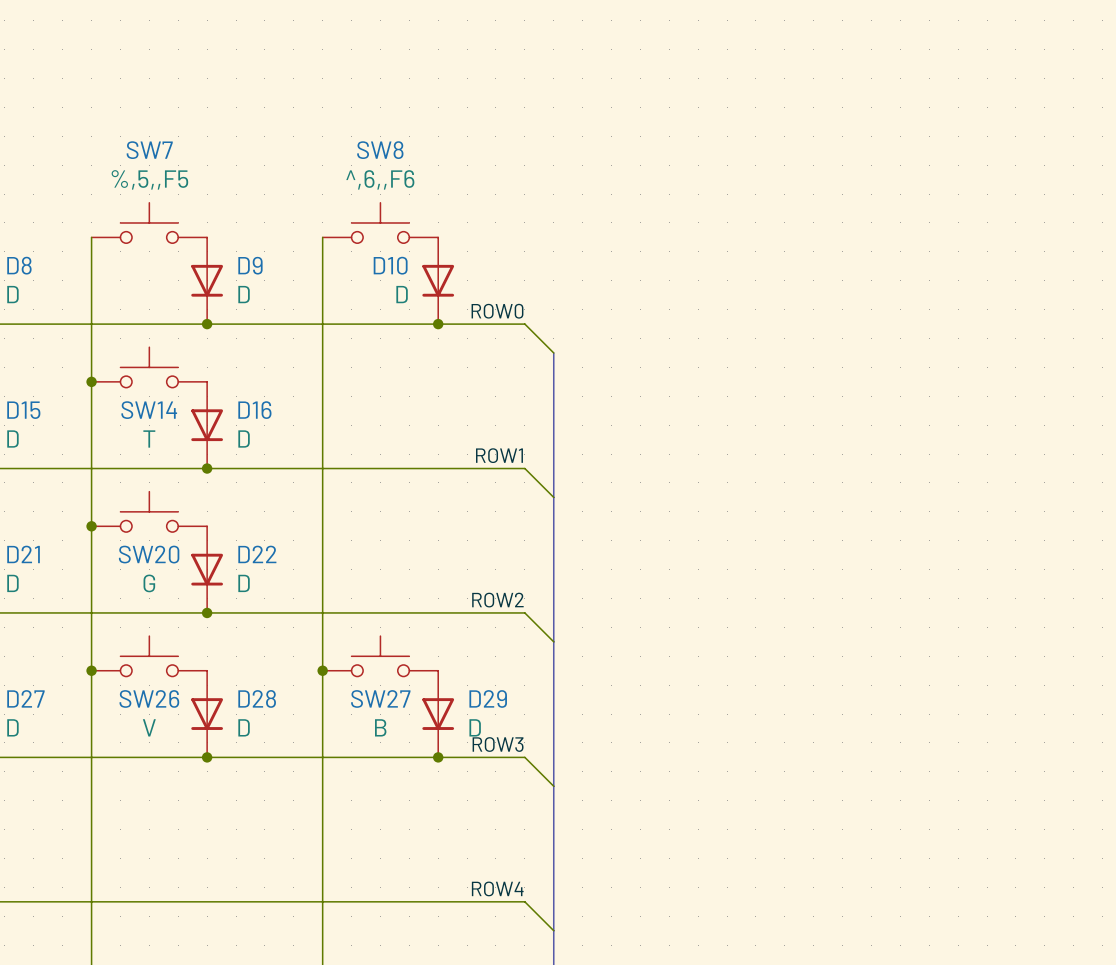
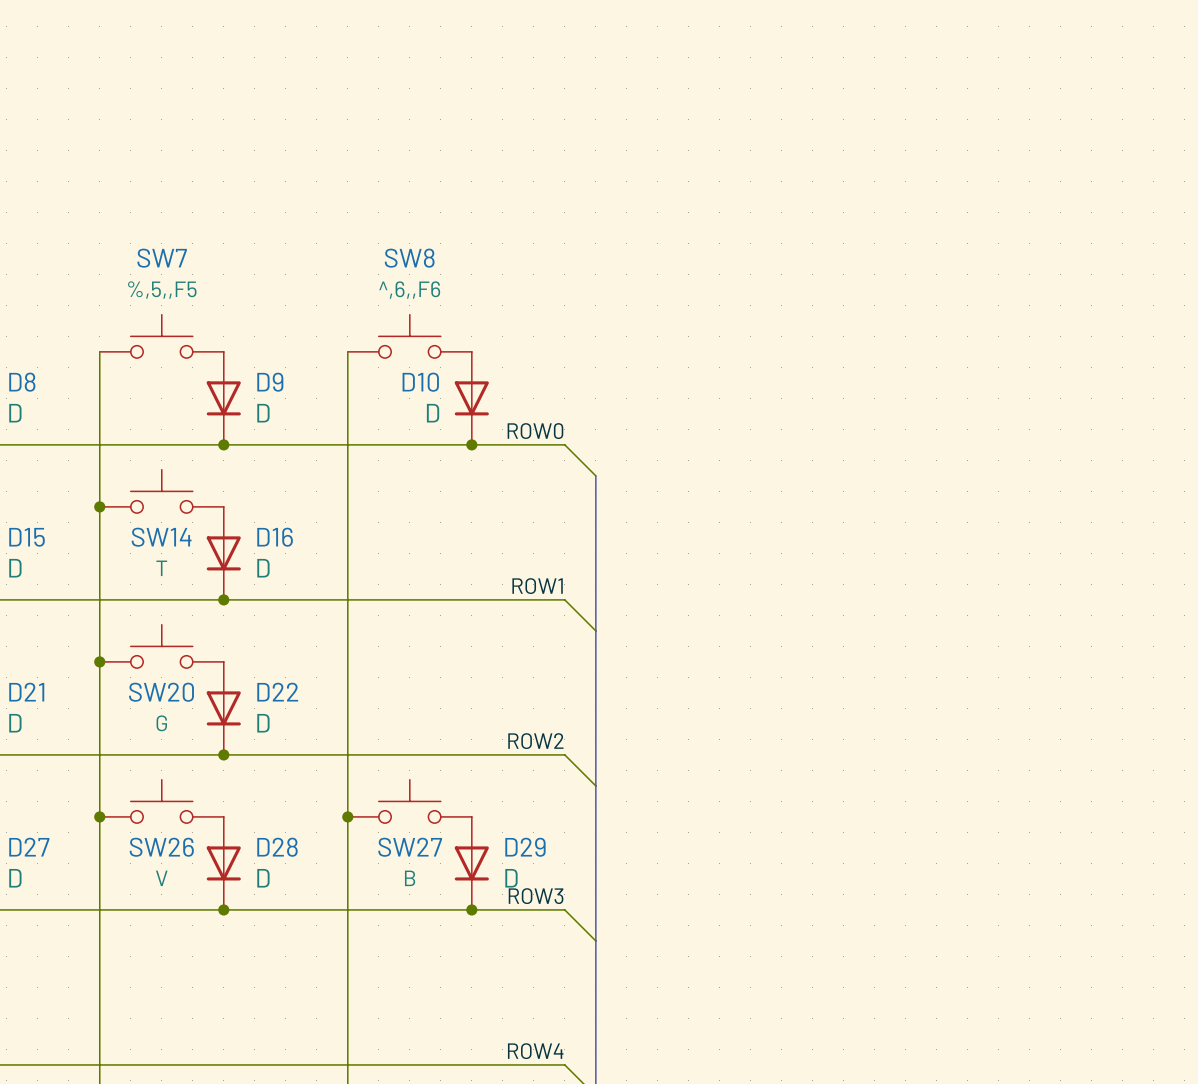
SW7 text: none -> %,5,,F5 (162, 290)
SW7 value: %,5,,F5 (149, 179) -> none
SW8 text: none -> ^,6,,F6 (409, 290)
SW8 value: ^,6,,F6 (380, 179) -> none
SW14 value: T (149, 438) -> none
SW14 text: none -> T (161, 568)
SW20 text: none -> G (161, 723)
SW20 value: G (149, 583) -> none
SW26 text: none -> V (161, 878)
SW26 value: V (149, 727) -> none
SW27 text: none -> B (410, 878)
SW27 value: B (380, 727) -> none

